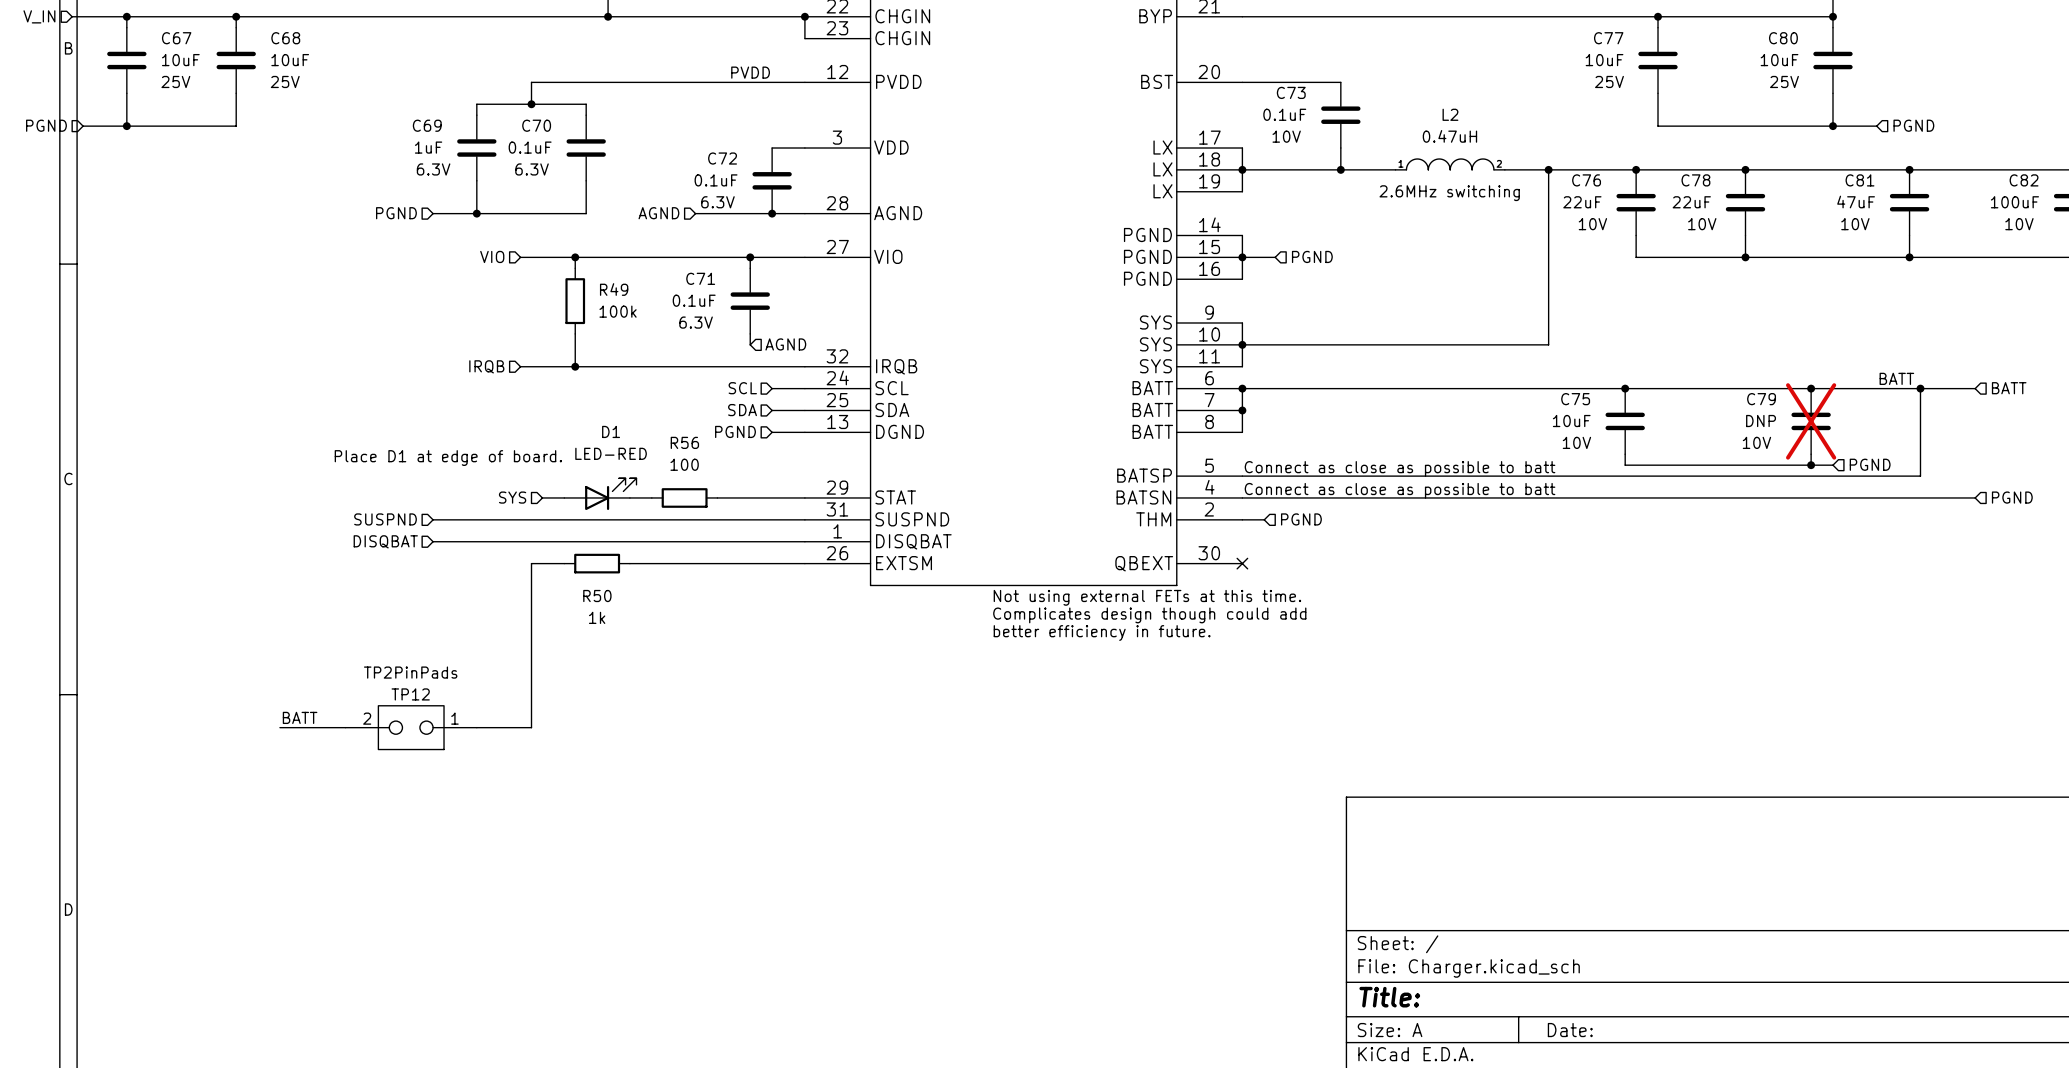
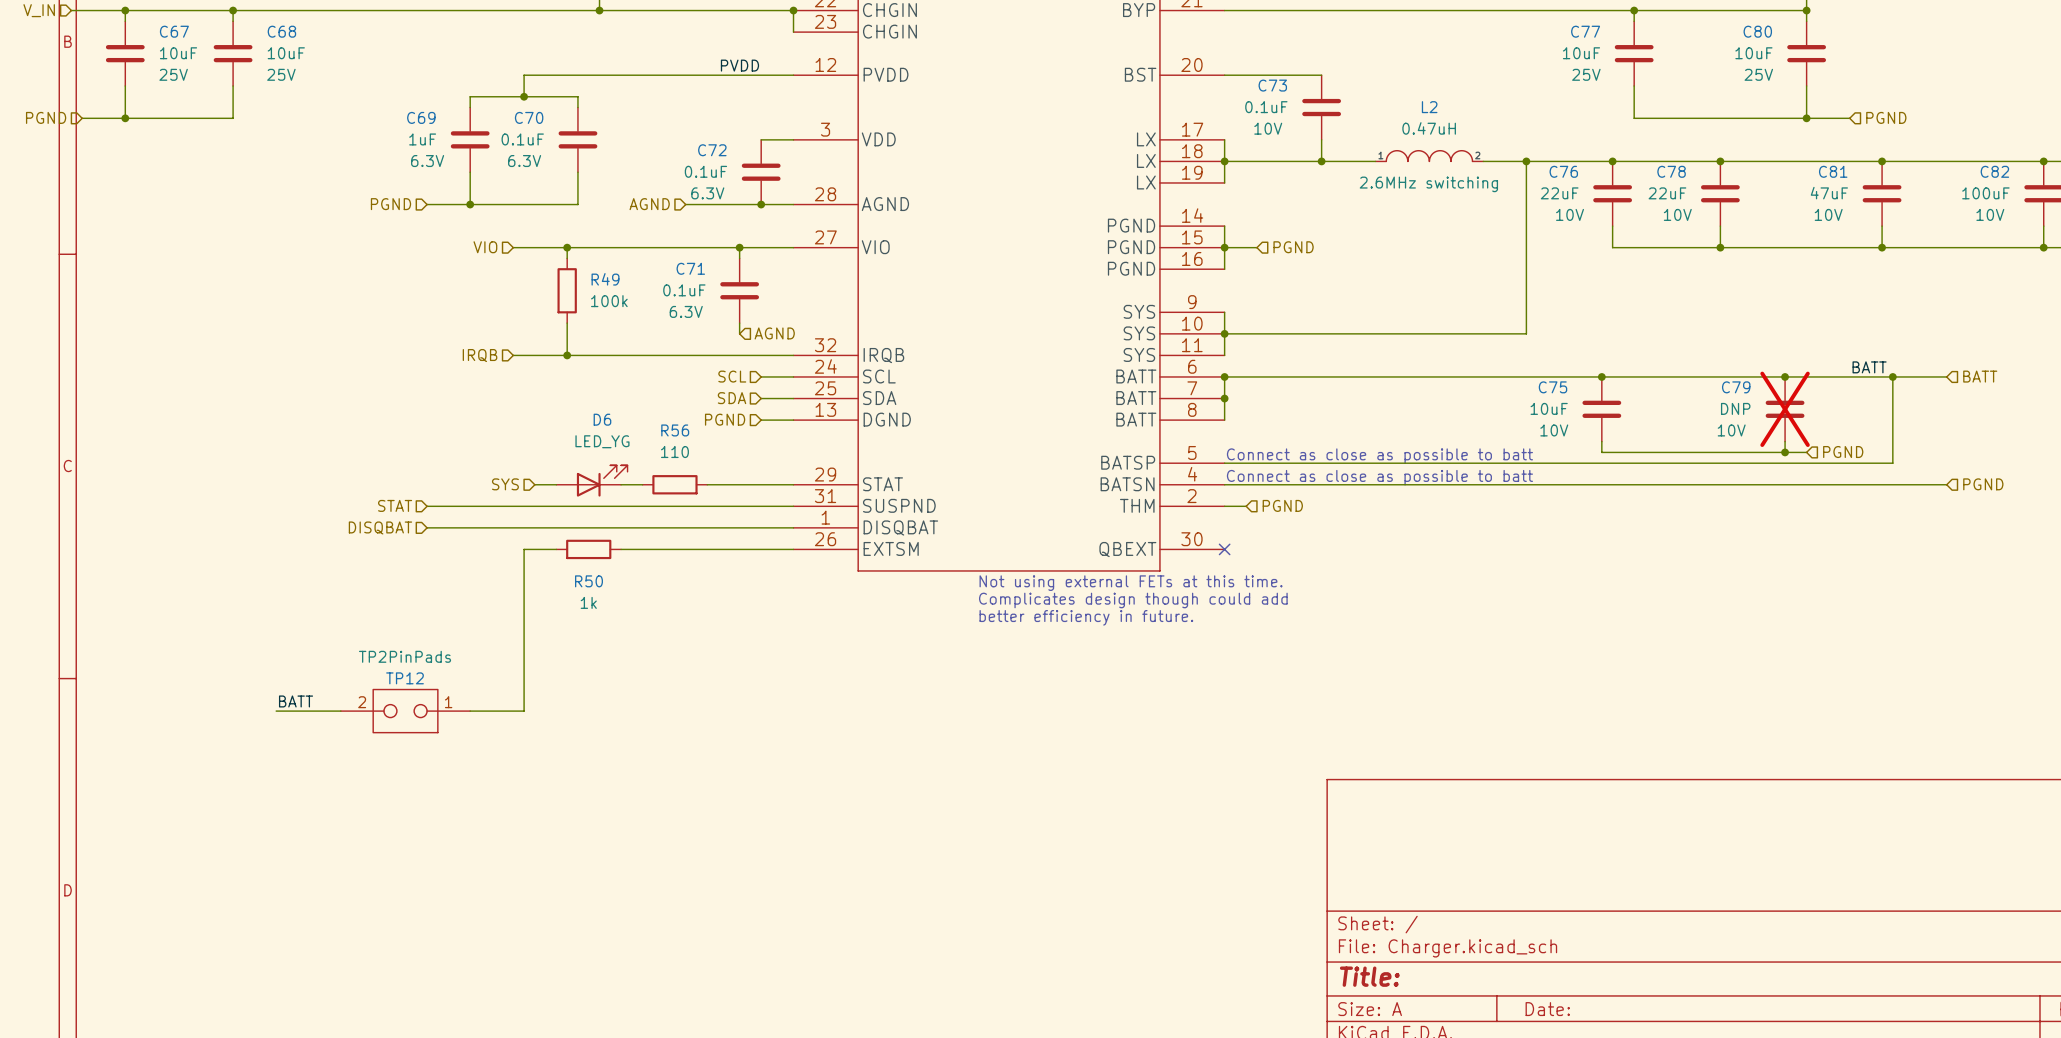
D1 name: D1 (611, 431) -> D6 (602, 419)
D1 value: LED-RED (611, 453) -> LED_YG (602, 441)
text: Place D1 at edge of board. (448, 458) -> none
R56 value: 100 (684, 464) -> 110 (674, 452)
hierarchical label: SUSPND (385, 519) -> STAT (395, 505)

